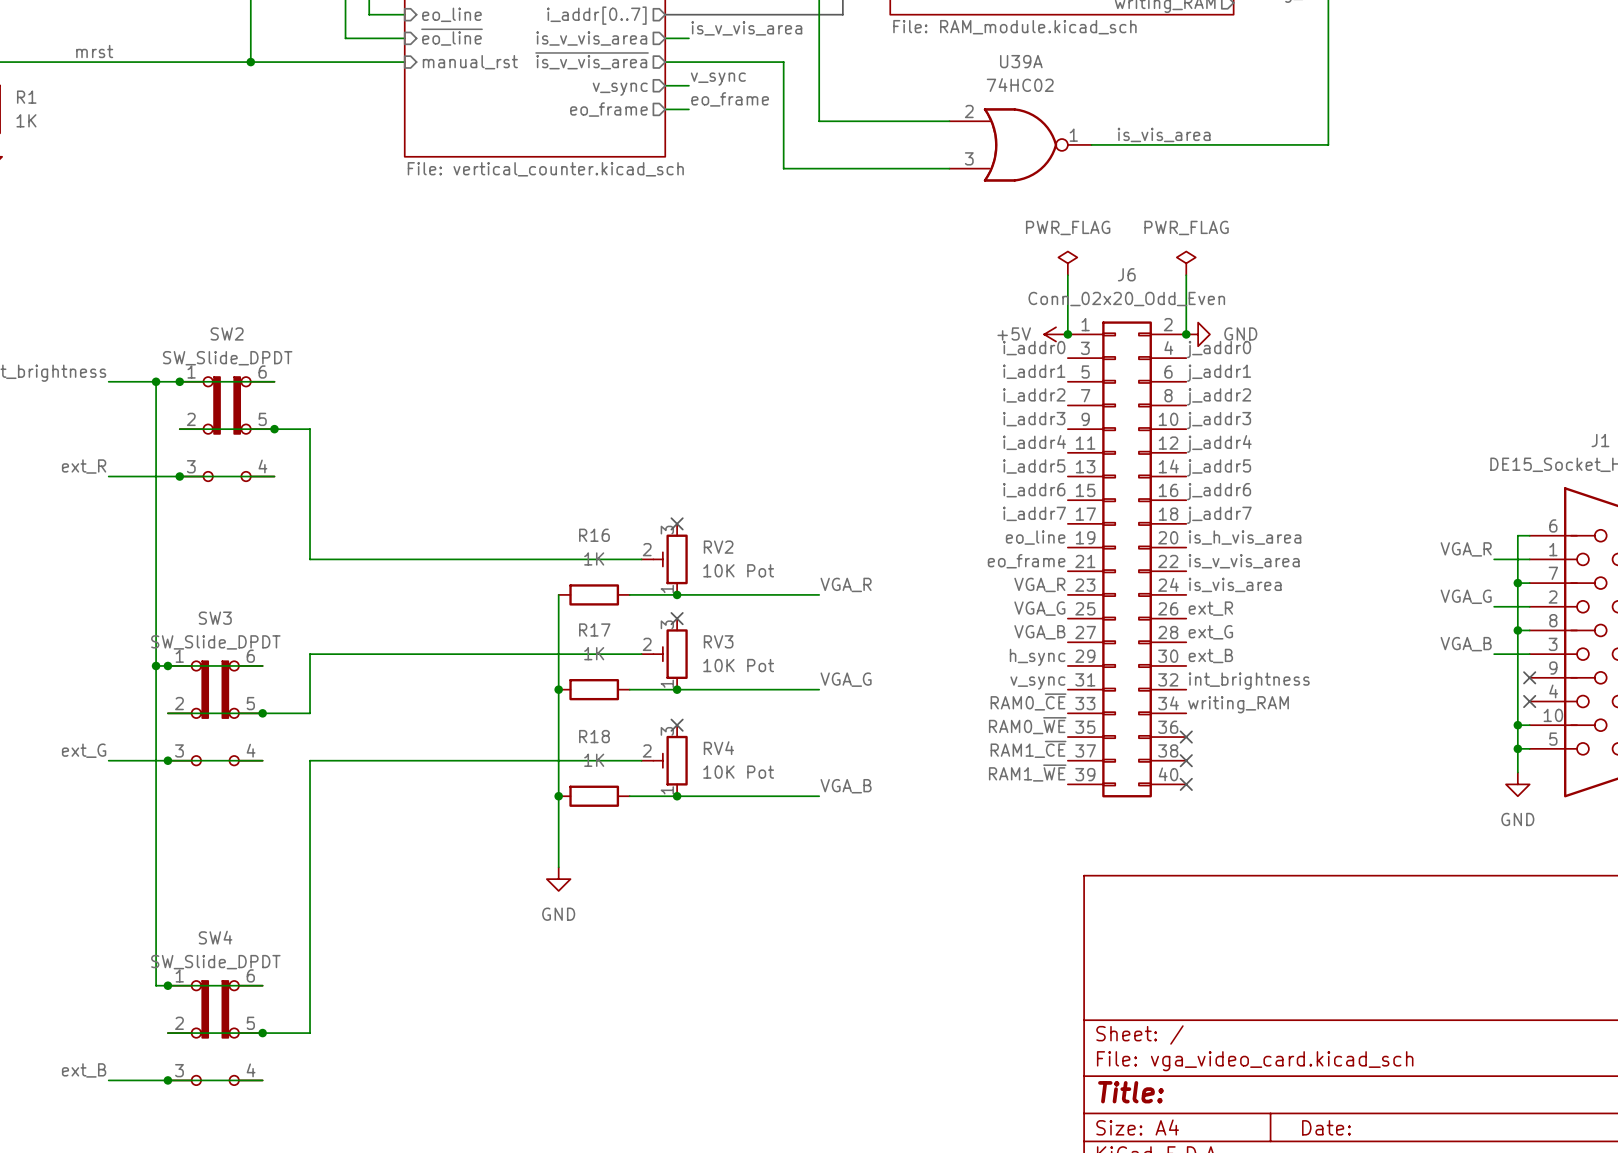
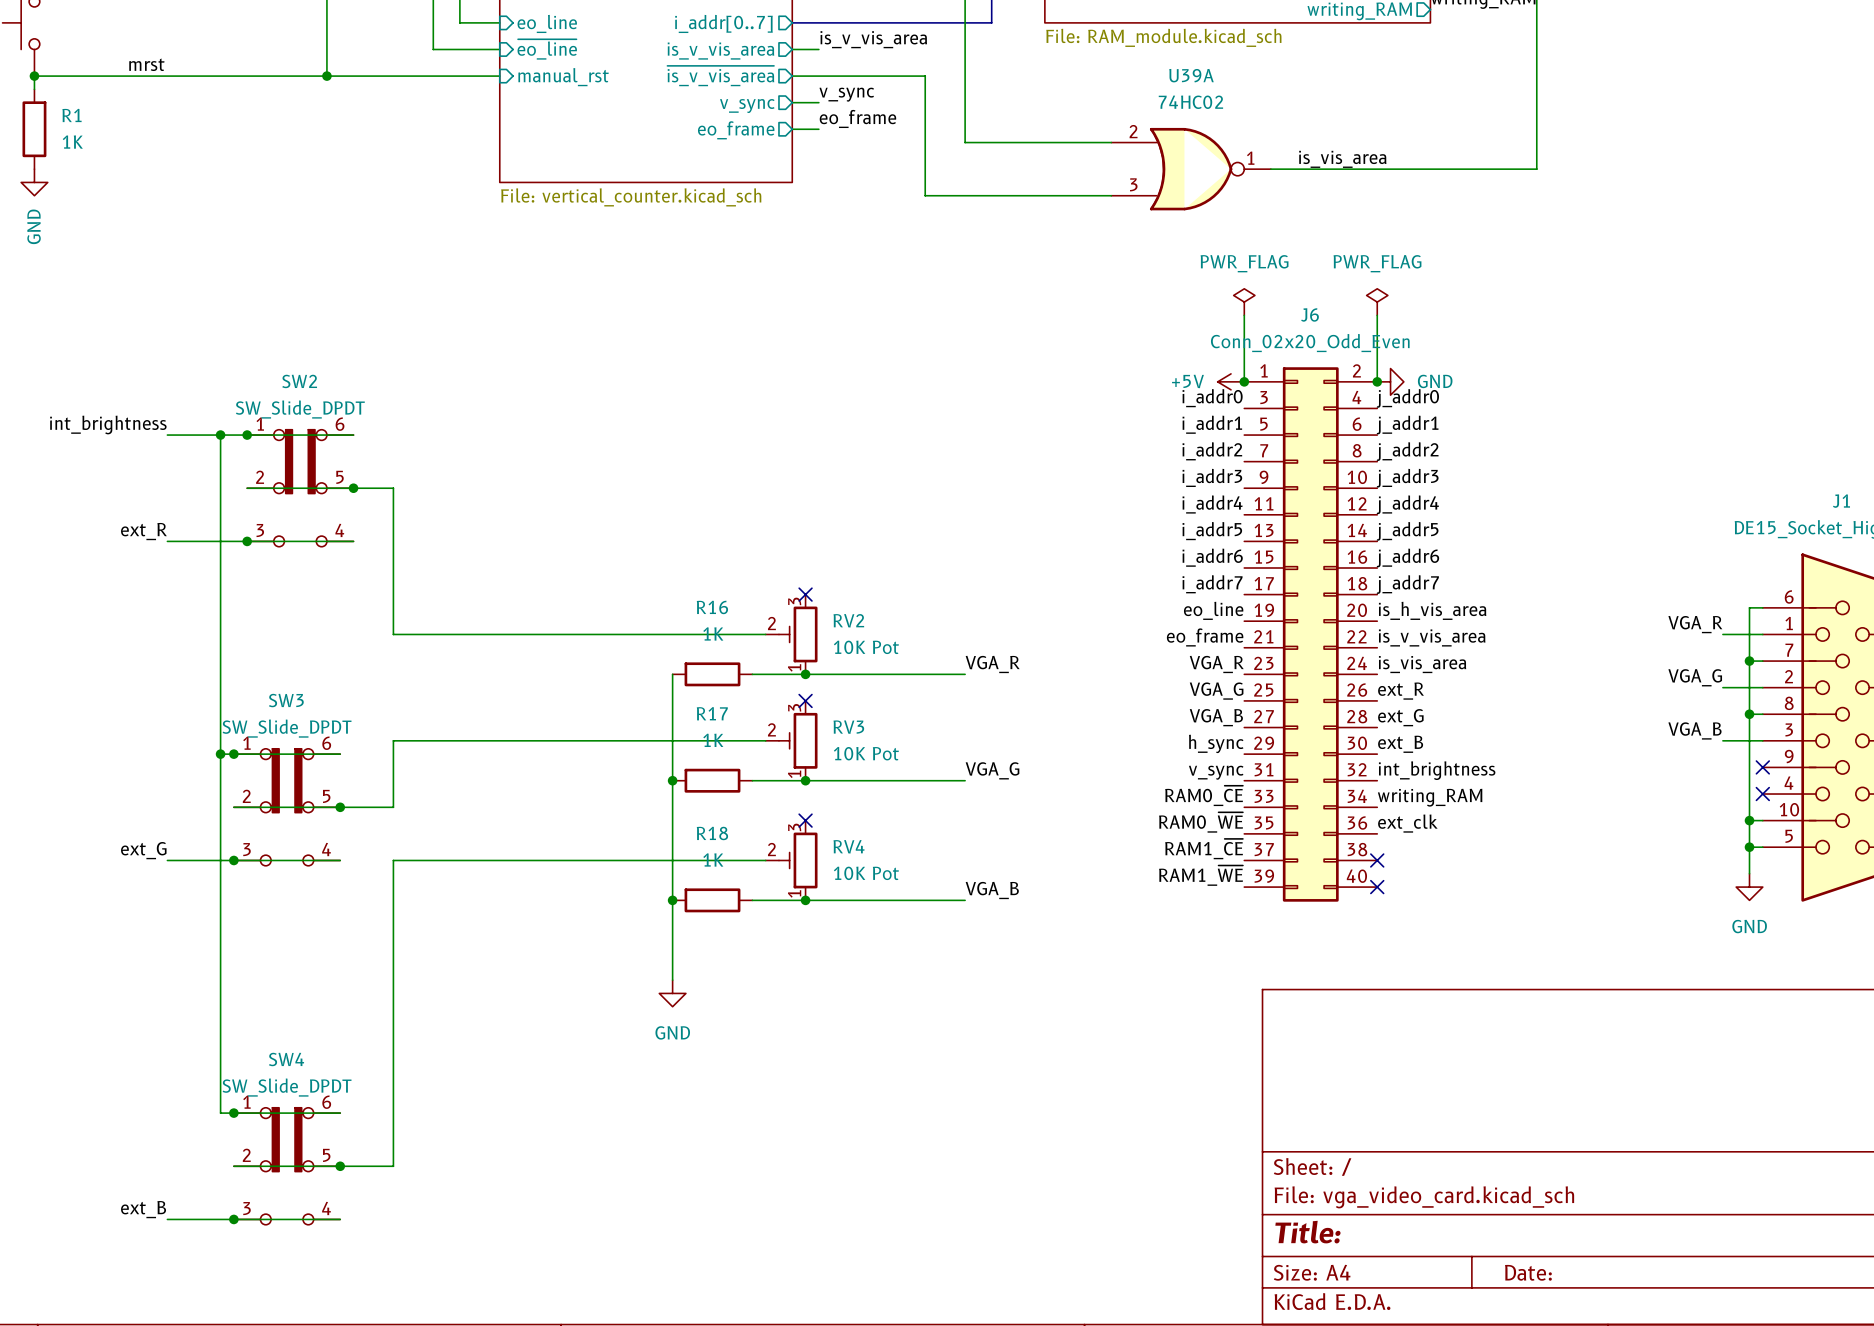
label: none -> ext_clk (1407, 823)
no-connect mark: (1186, 737) -> none

